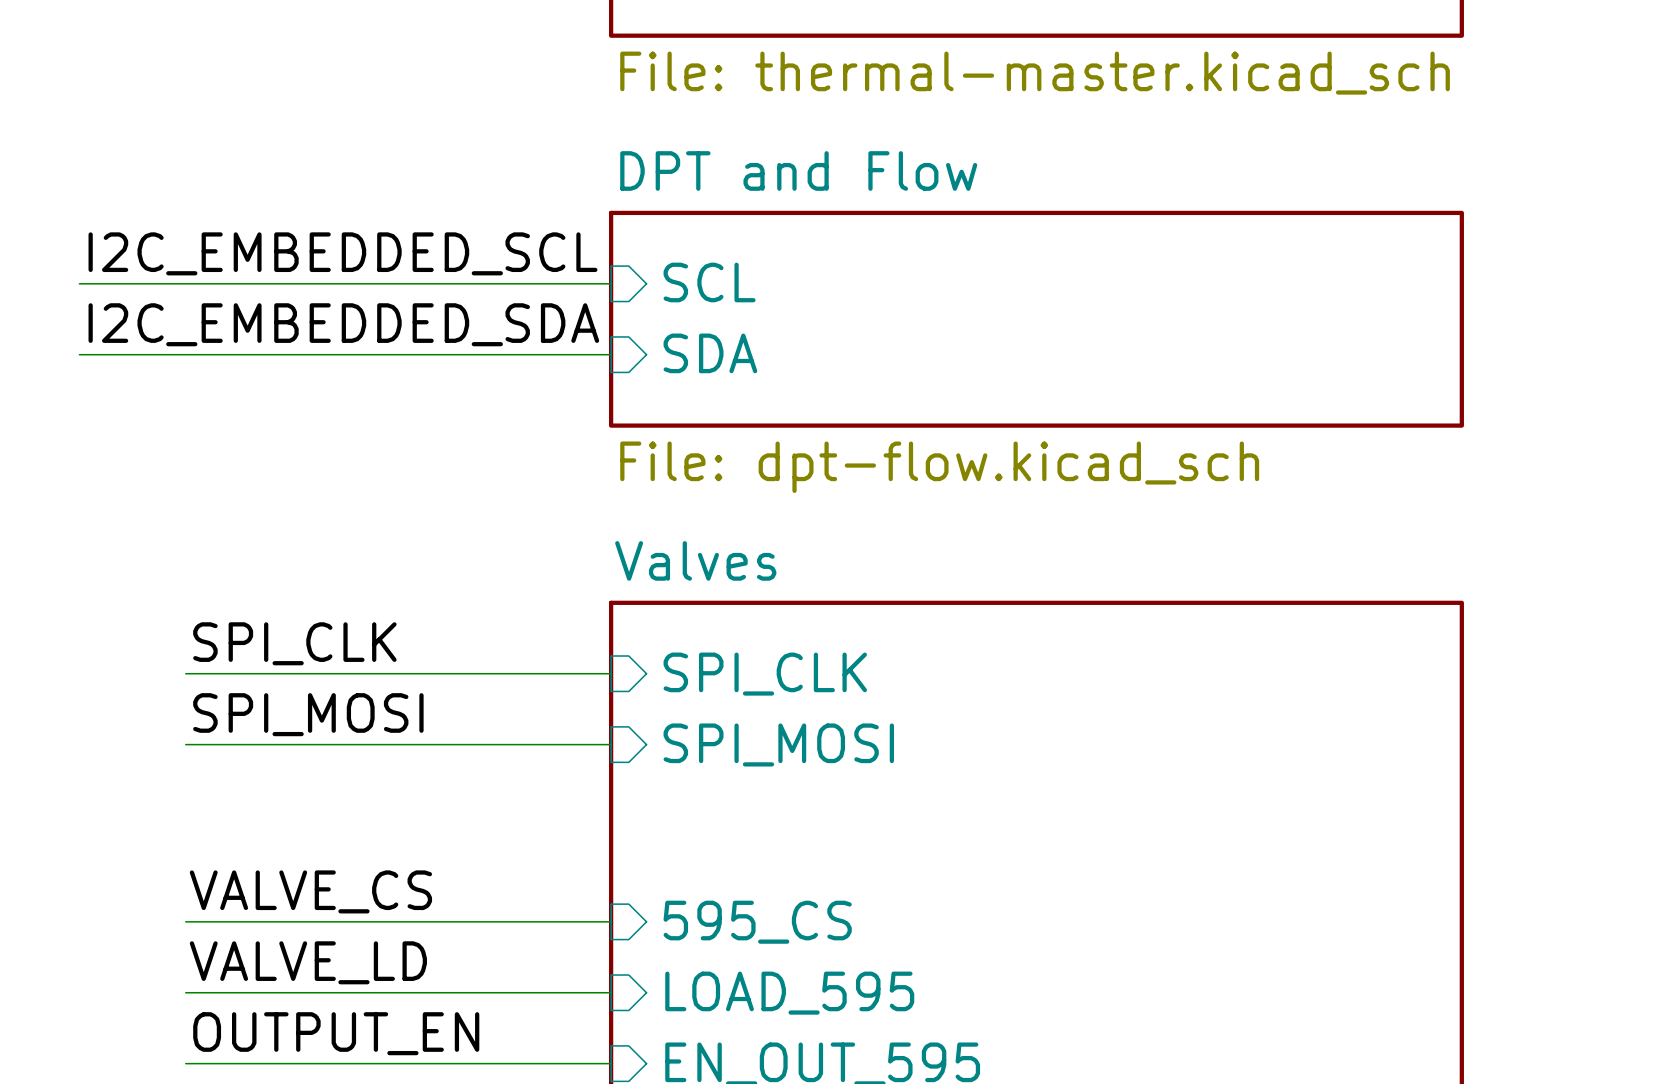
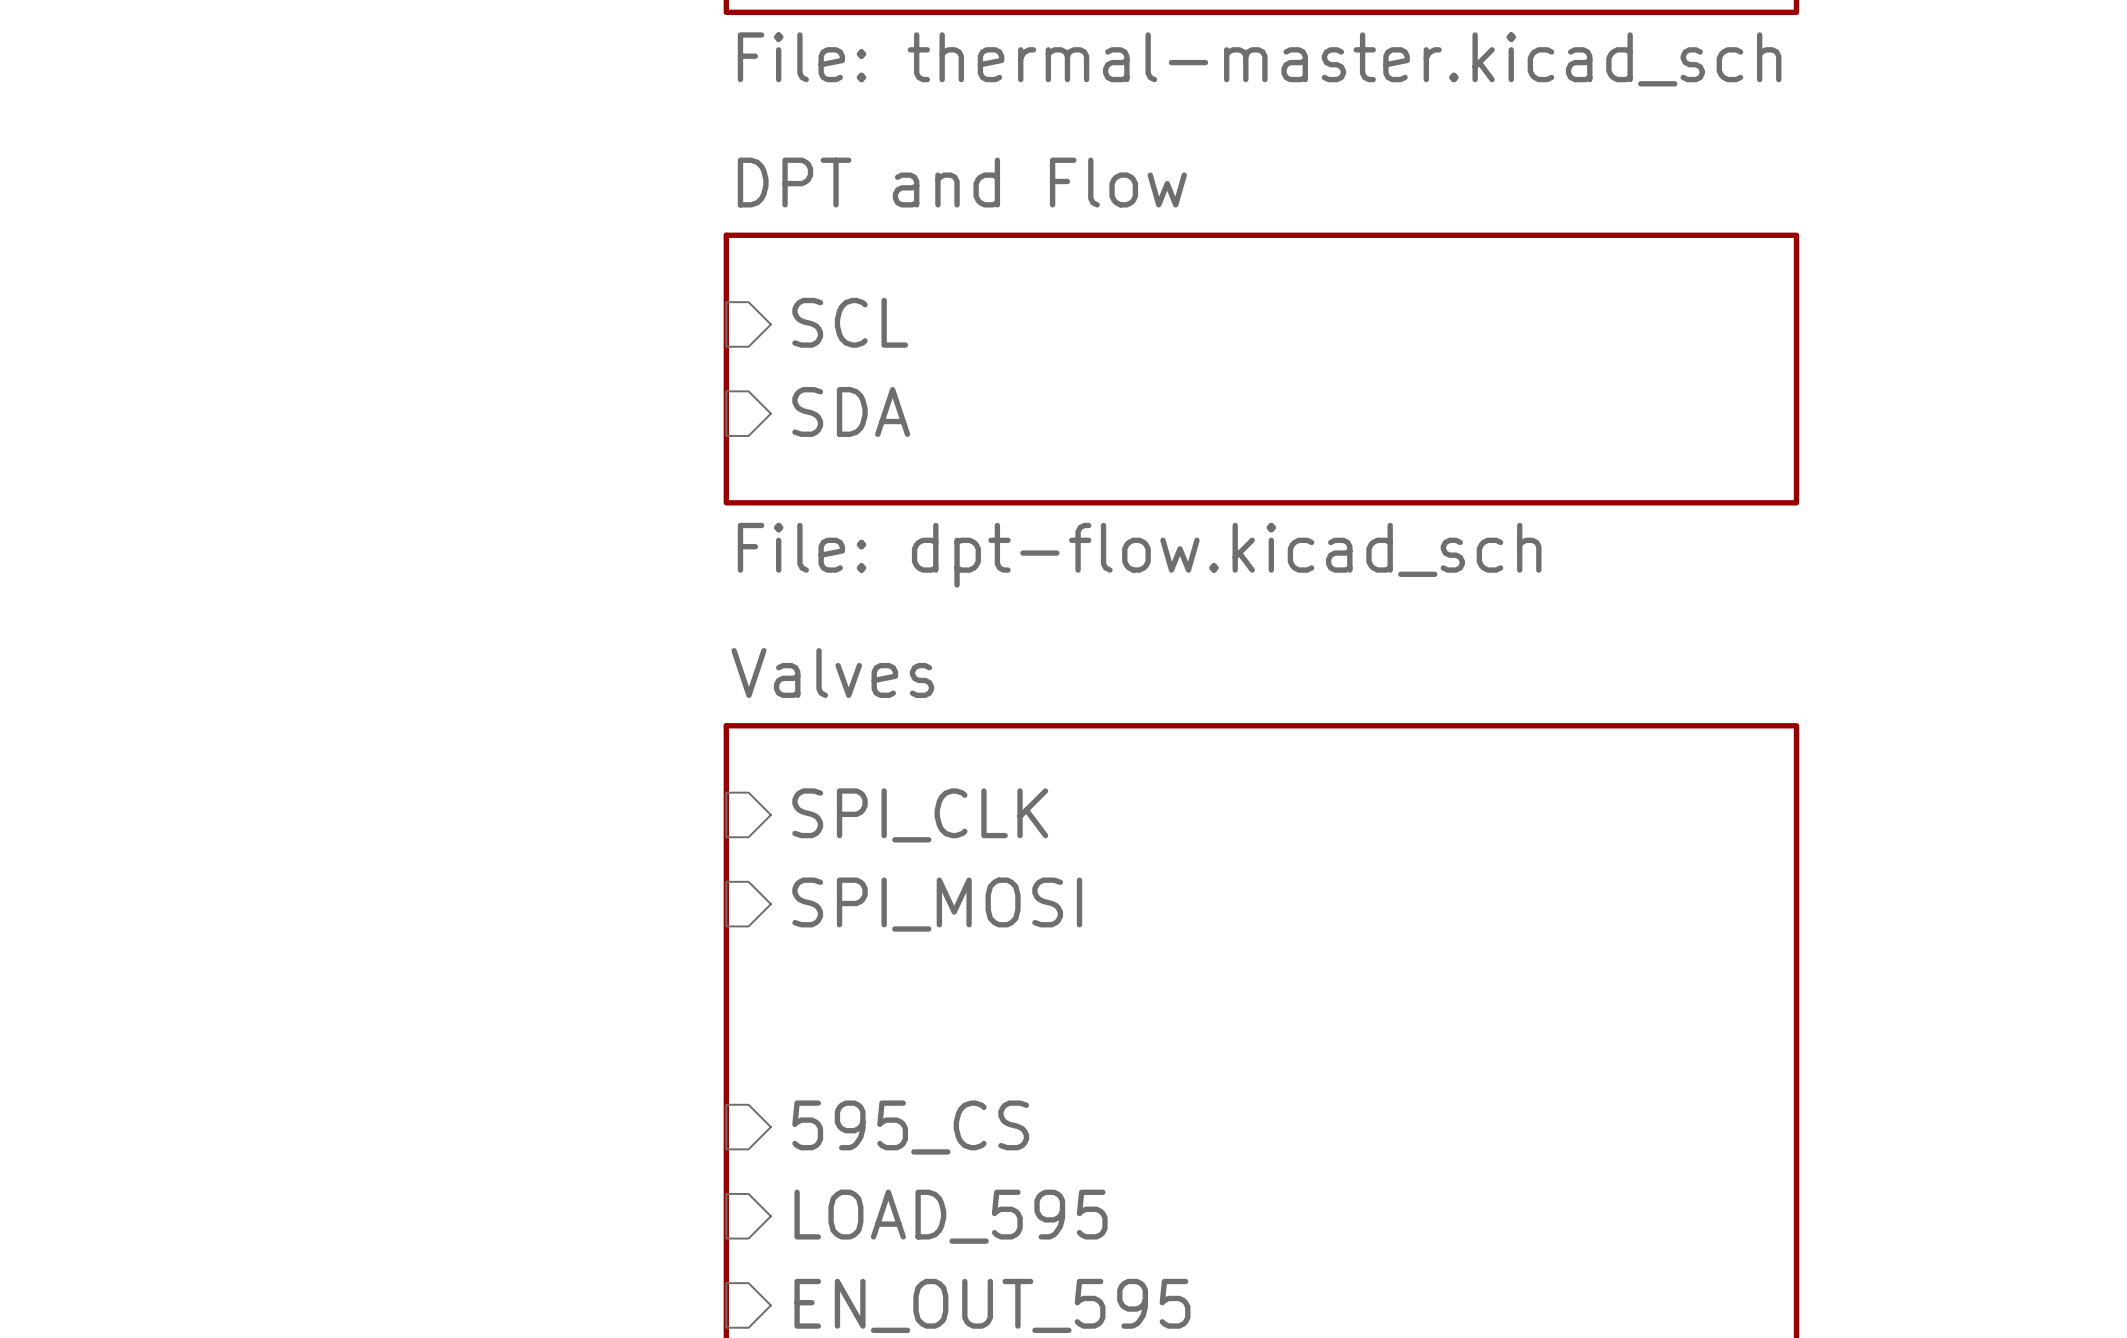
label: I2C_EMBEDDED_SCL (342, 253) -> none
wire: (79, 283) (611, 283) -> none
label: I2C_EMBEDDED_SDA (343, 324) -> none
wire: (79, 354) (611, 354) -> none
label: SPI_CLK (294, 643) -> none
wire: (185, 673) (611, 673) -> none
label: SPI_MOSI (308, 714) -> none
wire: (185, 744) (611, 744) -> none
label: VALVE_CS (310, 891) -> none
wire: (185, 921) (611, 921) -> none
label: VALVE_LD (308, 962) -> none
wire: (185, 992) (611, 992) -> none
label: OUTPUT_EN (336, 1033) -> none
wire: (185, 1063) (611, 1063) -> none

